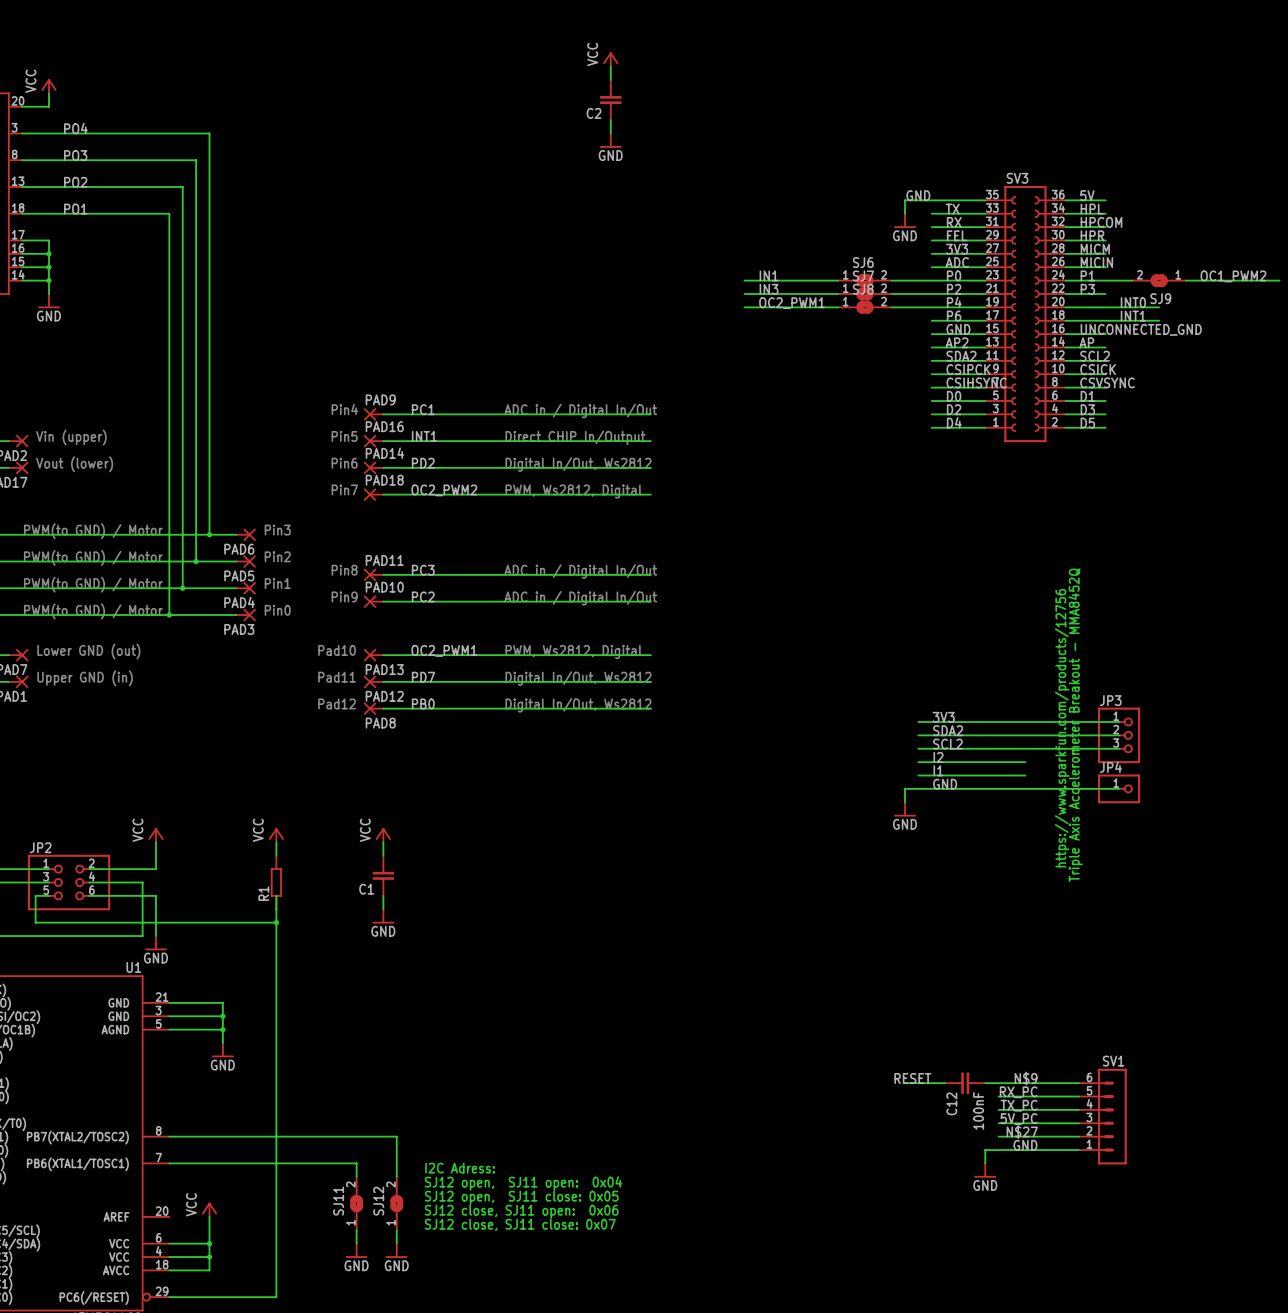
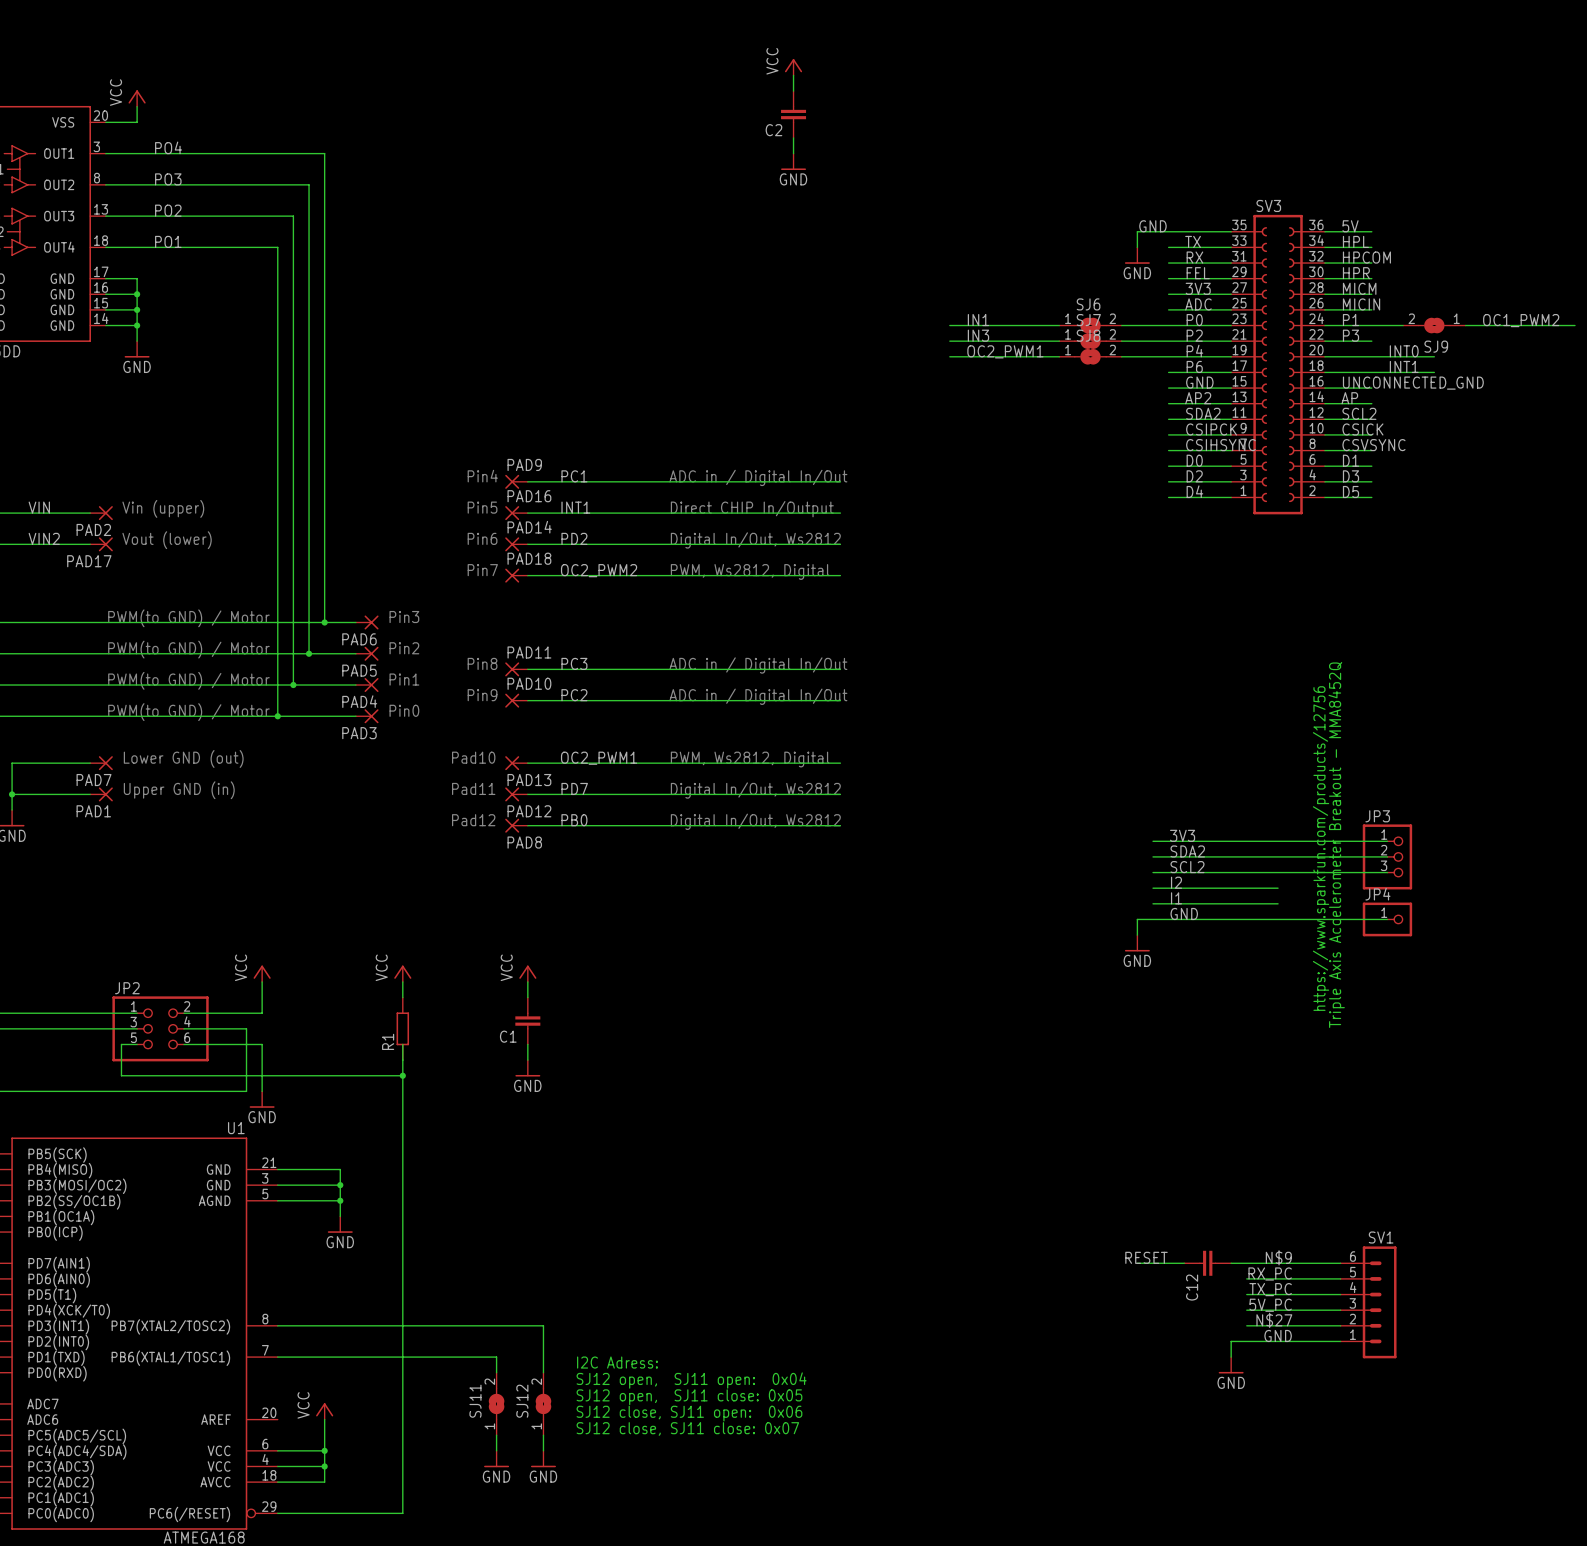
C12 value: 100nF (978, 1110) -> none

